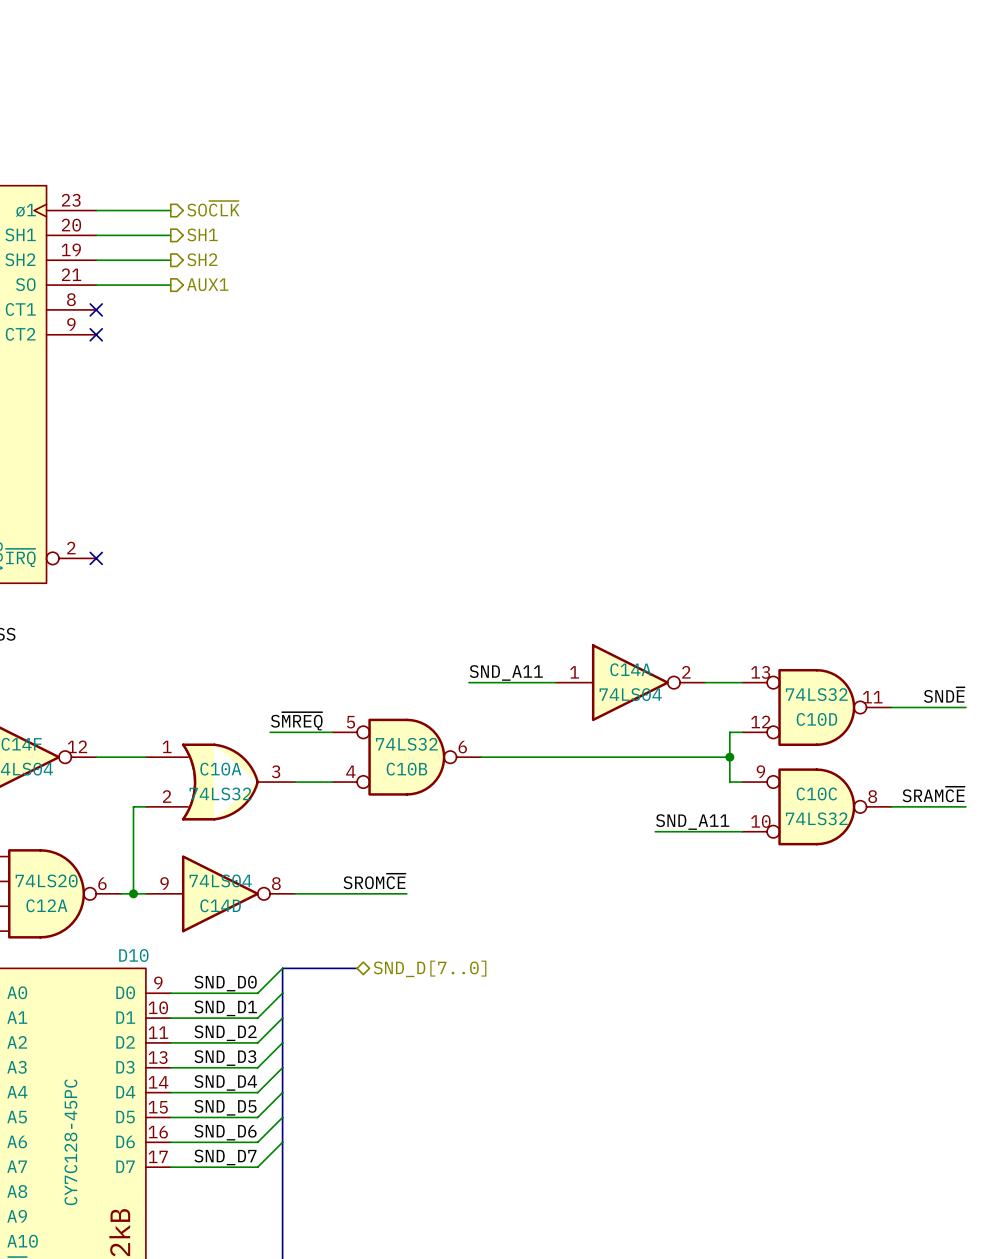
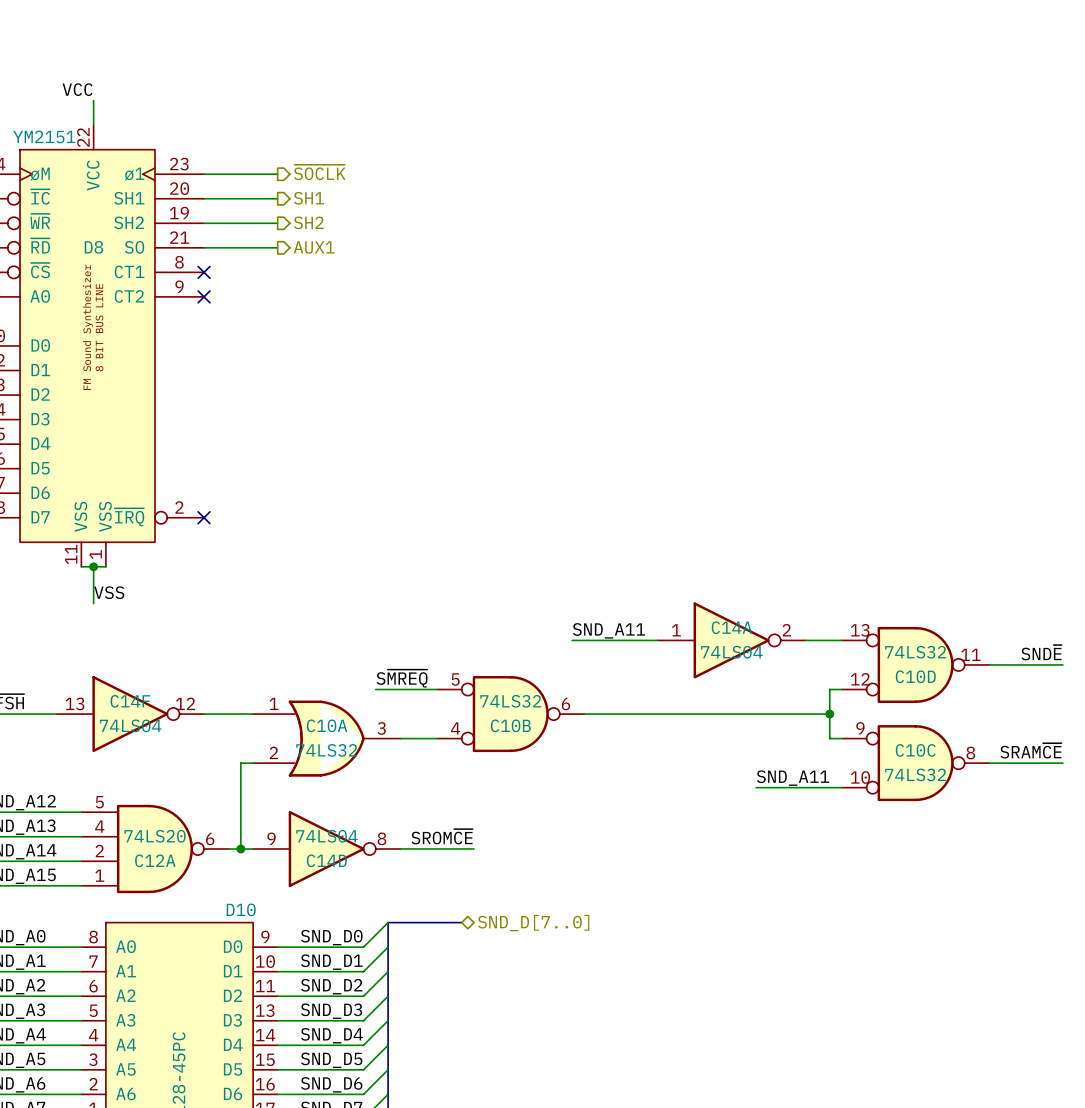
hierarchical label: SO~{CLK} (213, 208) -> ~{SOCLK} (319, 172)
label position: SROM~{CE} (374, 881) -> SROM~{CE} (442, 836)
wire: (369, 893) (406, 893) -> none

